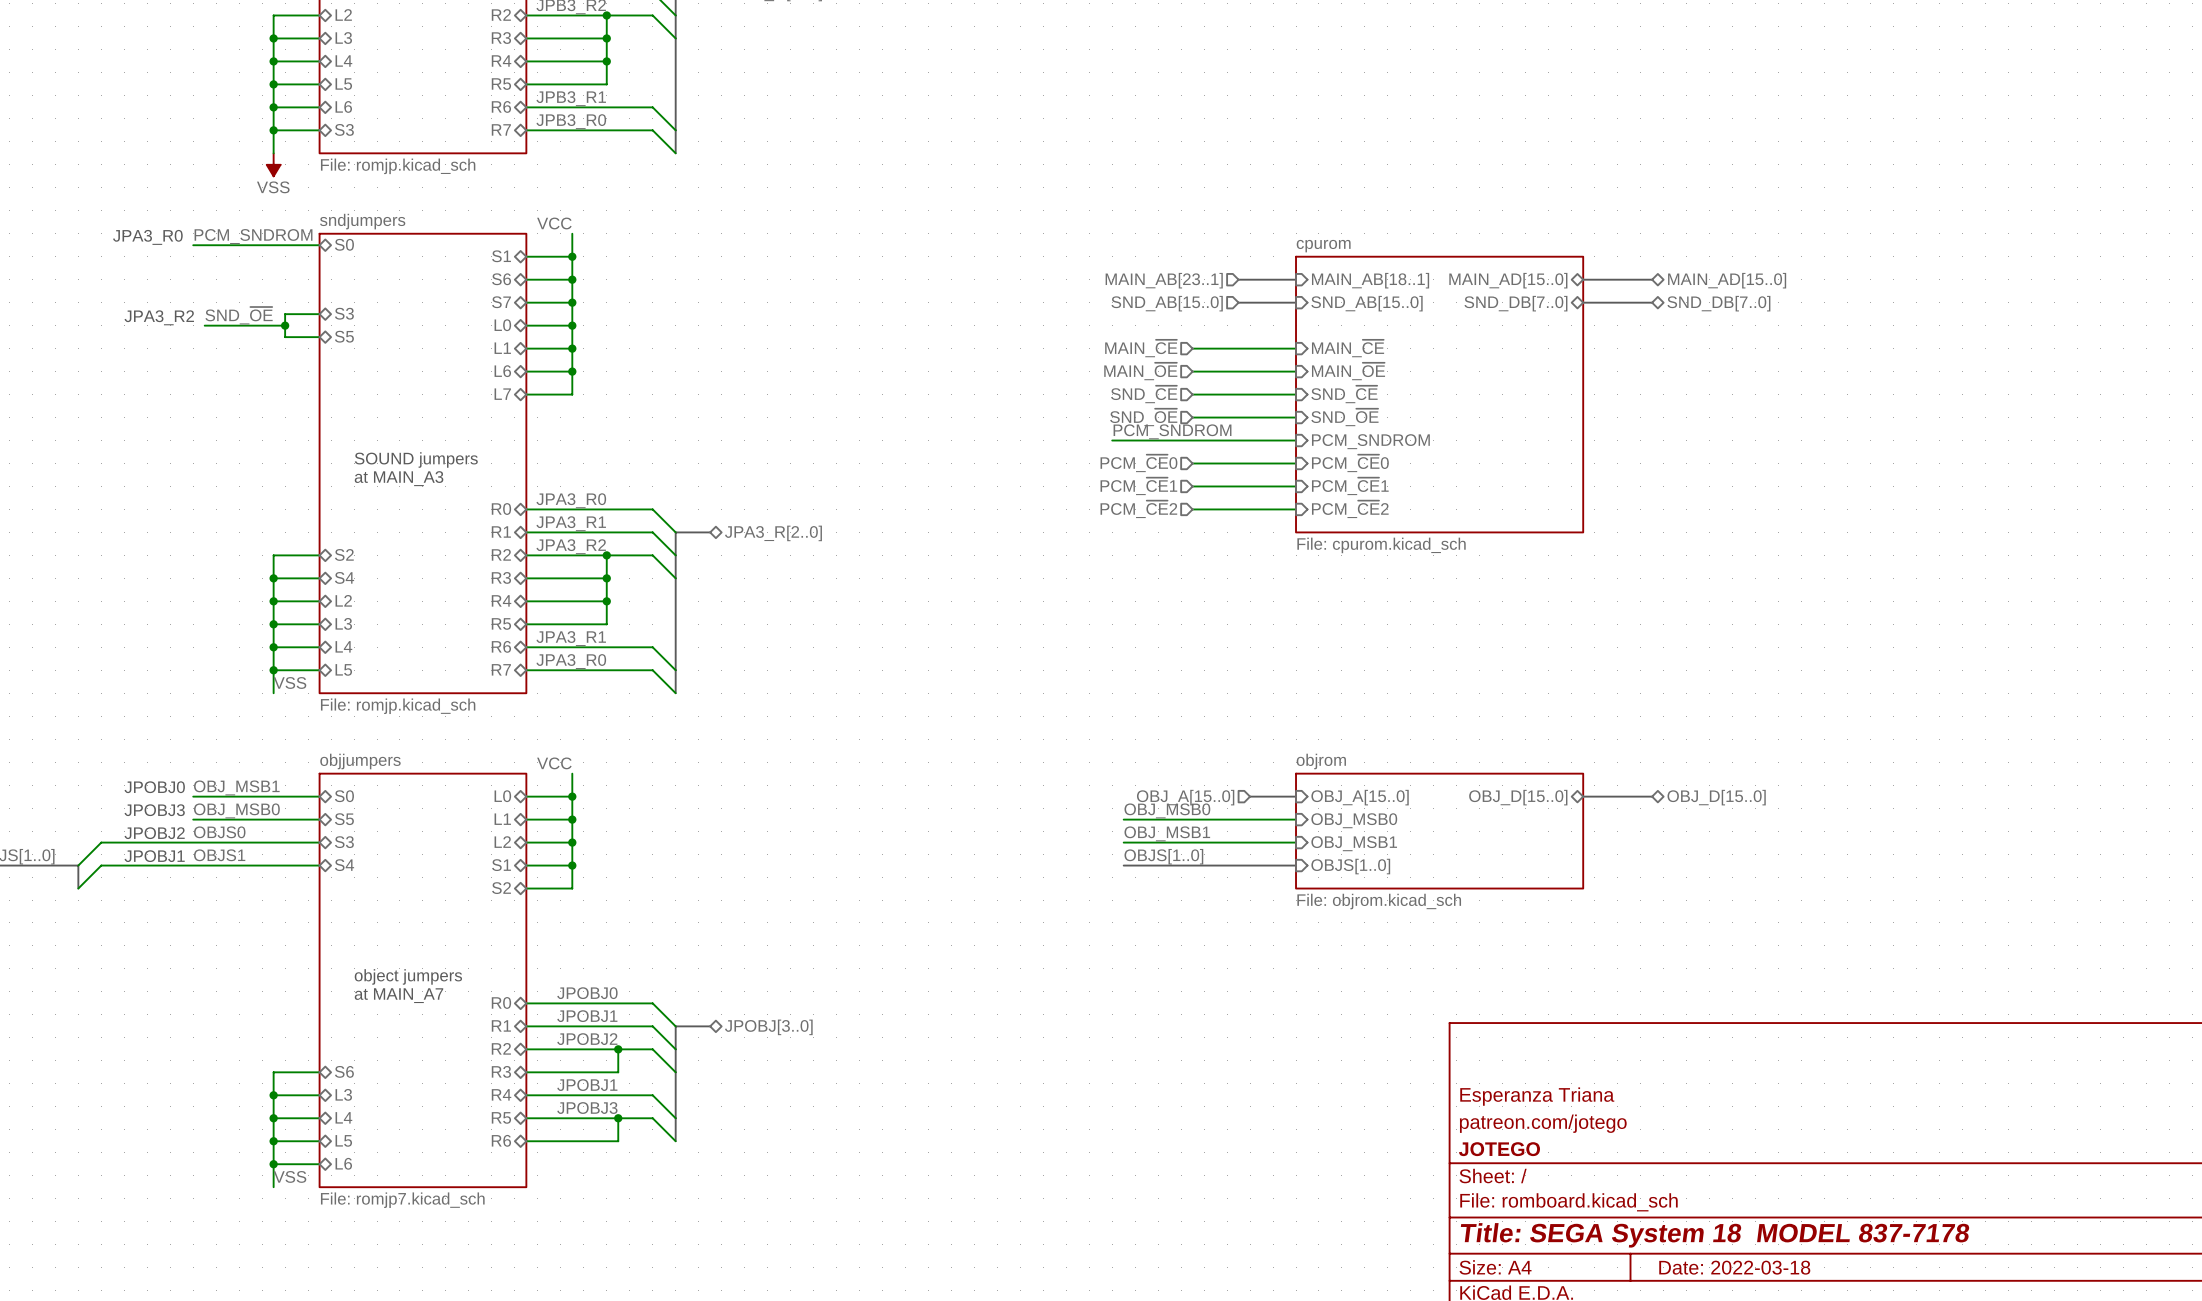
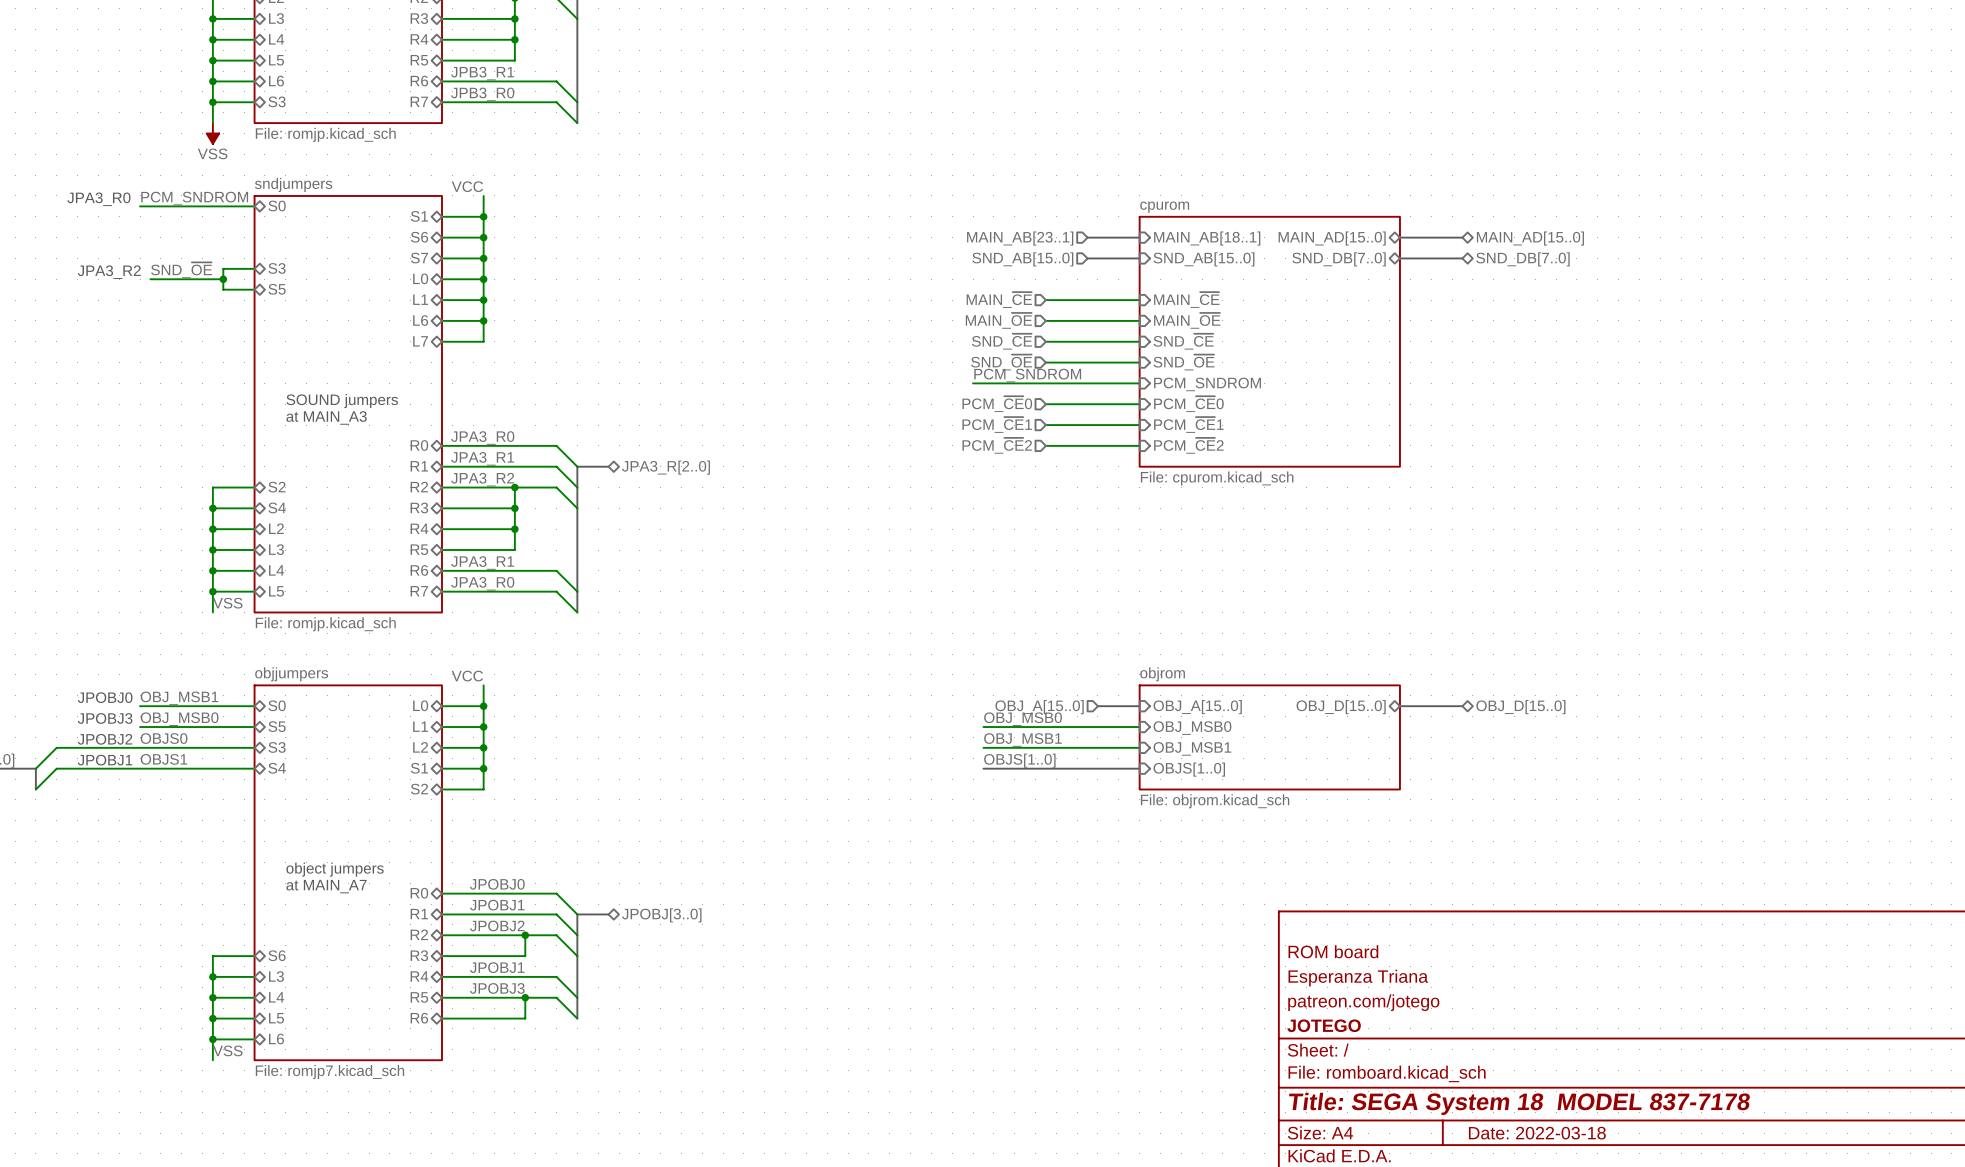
title block: none -> ROM board (1333, 951)

